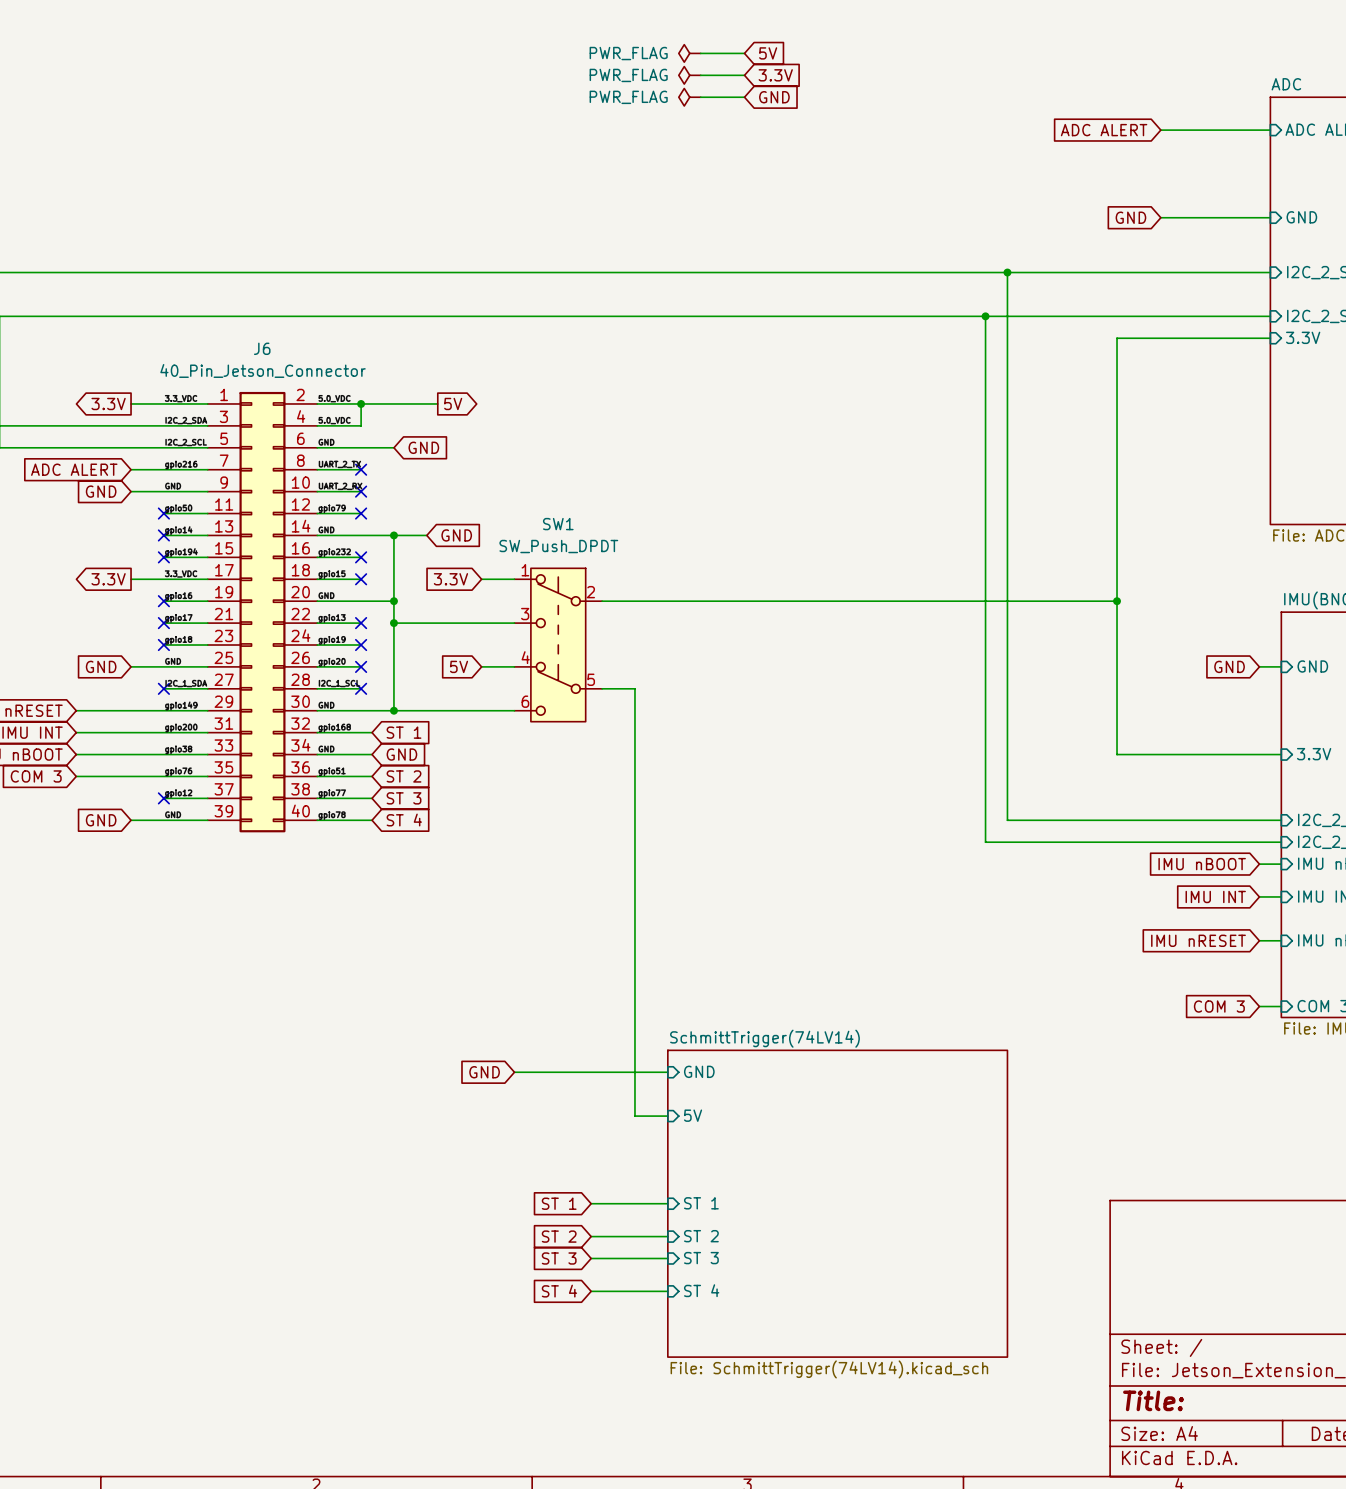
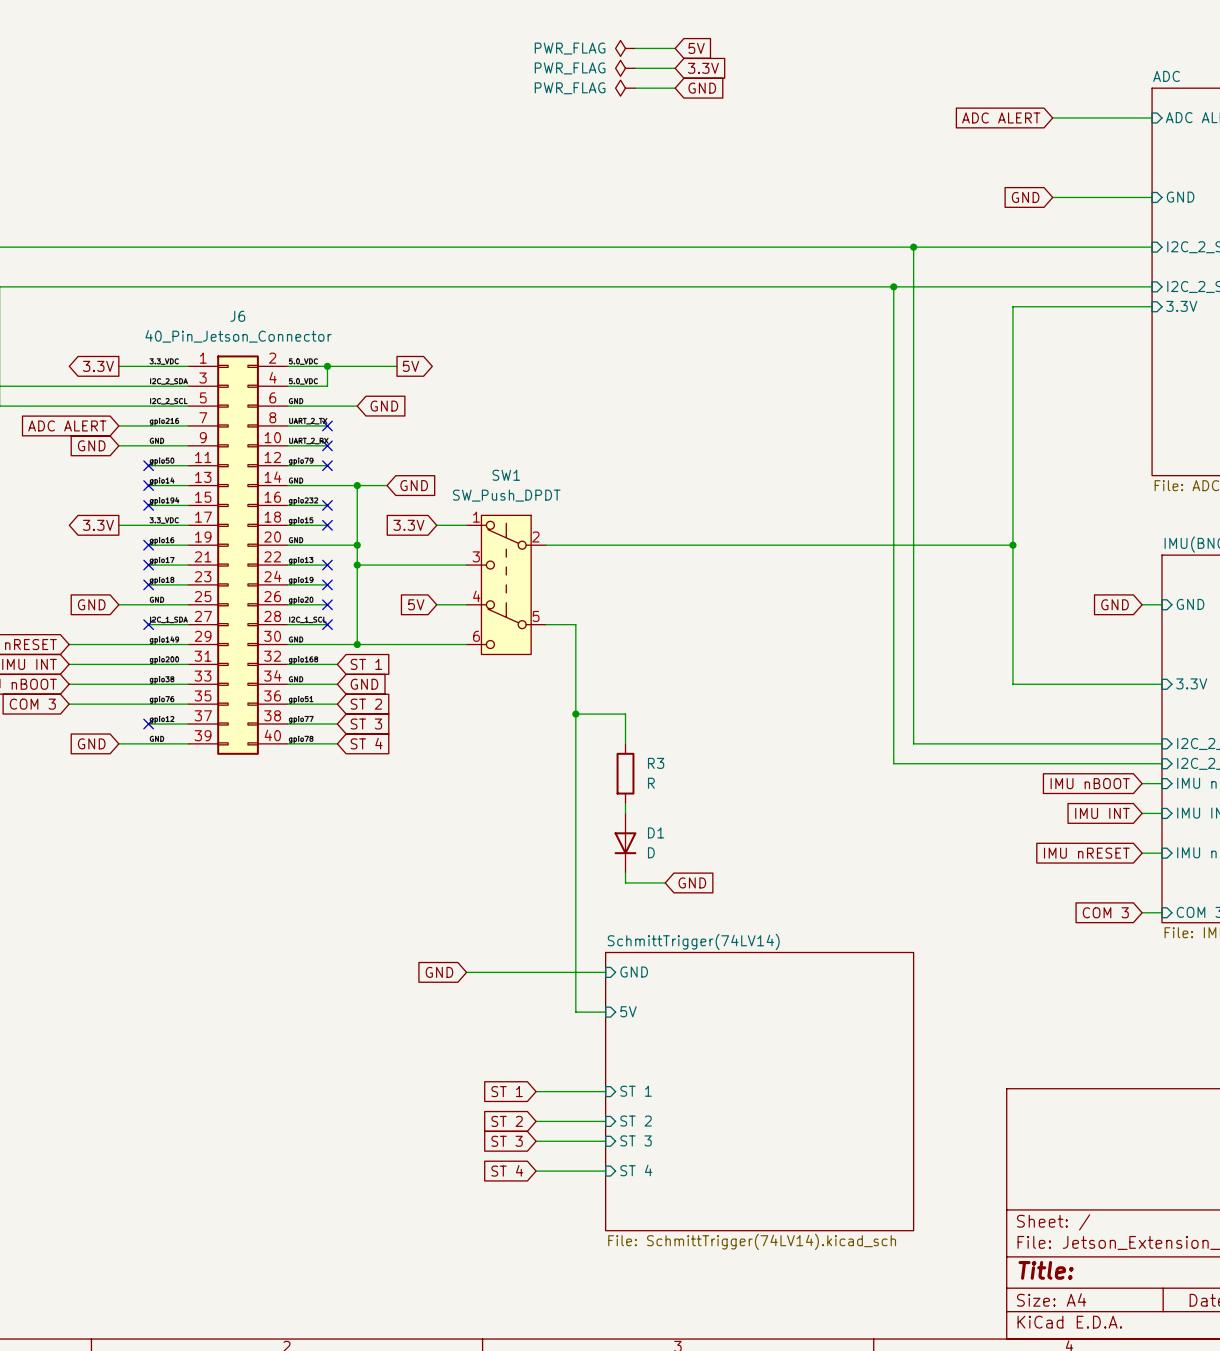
wire: none -> (575, 714) (625, 714) (625, 743)
junction: none -> (575, 714)
R3: none -> R (625, 773)
wire: none -> (625, 803) (625, 813)
D1: none -> D (625, 843)
wire: none -> (625, 873) (625, 882) (665, 882)
global label: none -> GND (692, 882)

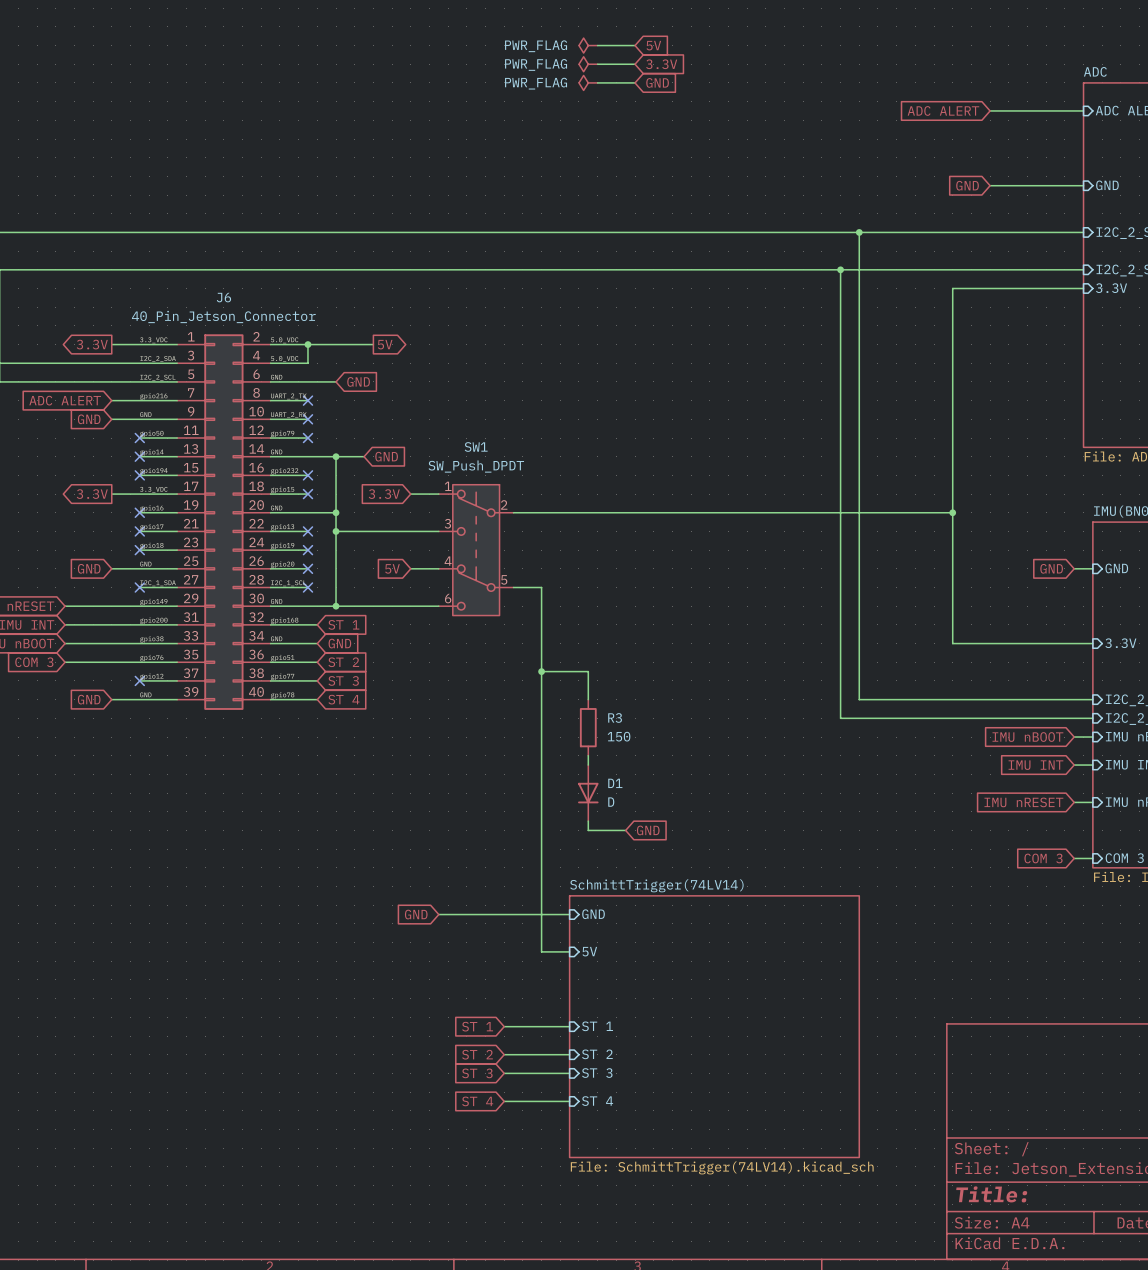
R3 value: R (651, 783) -> 150 (619, 736)

